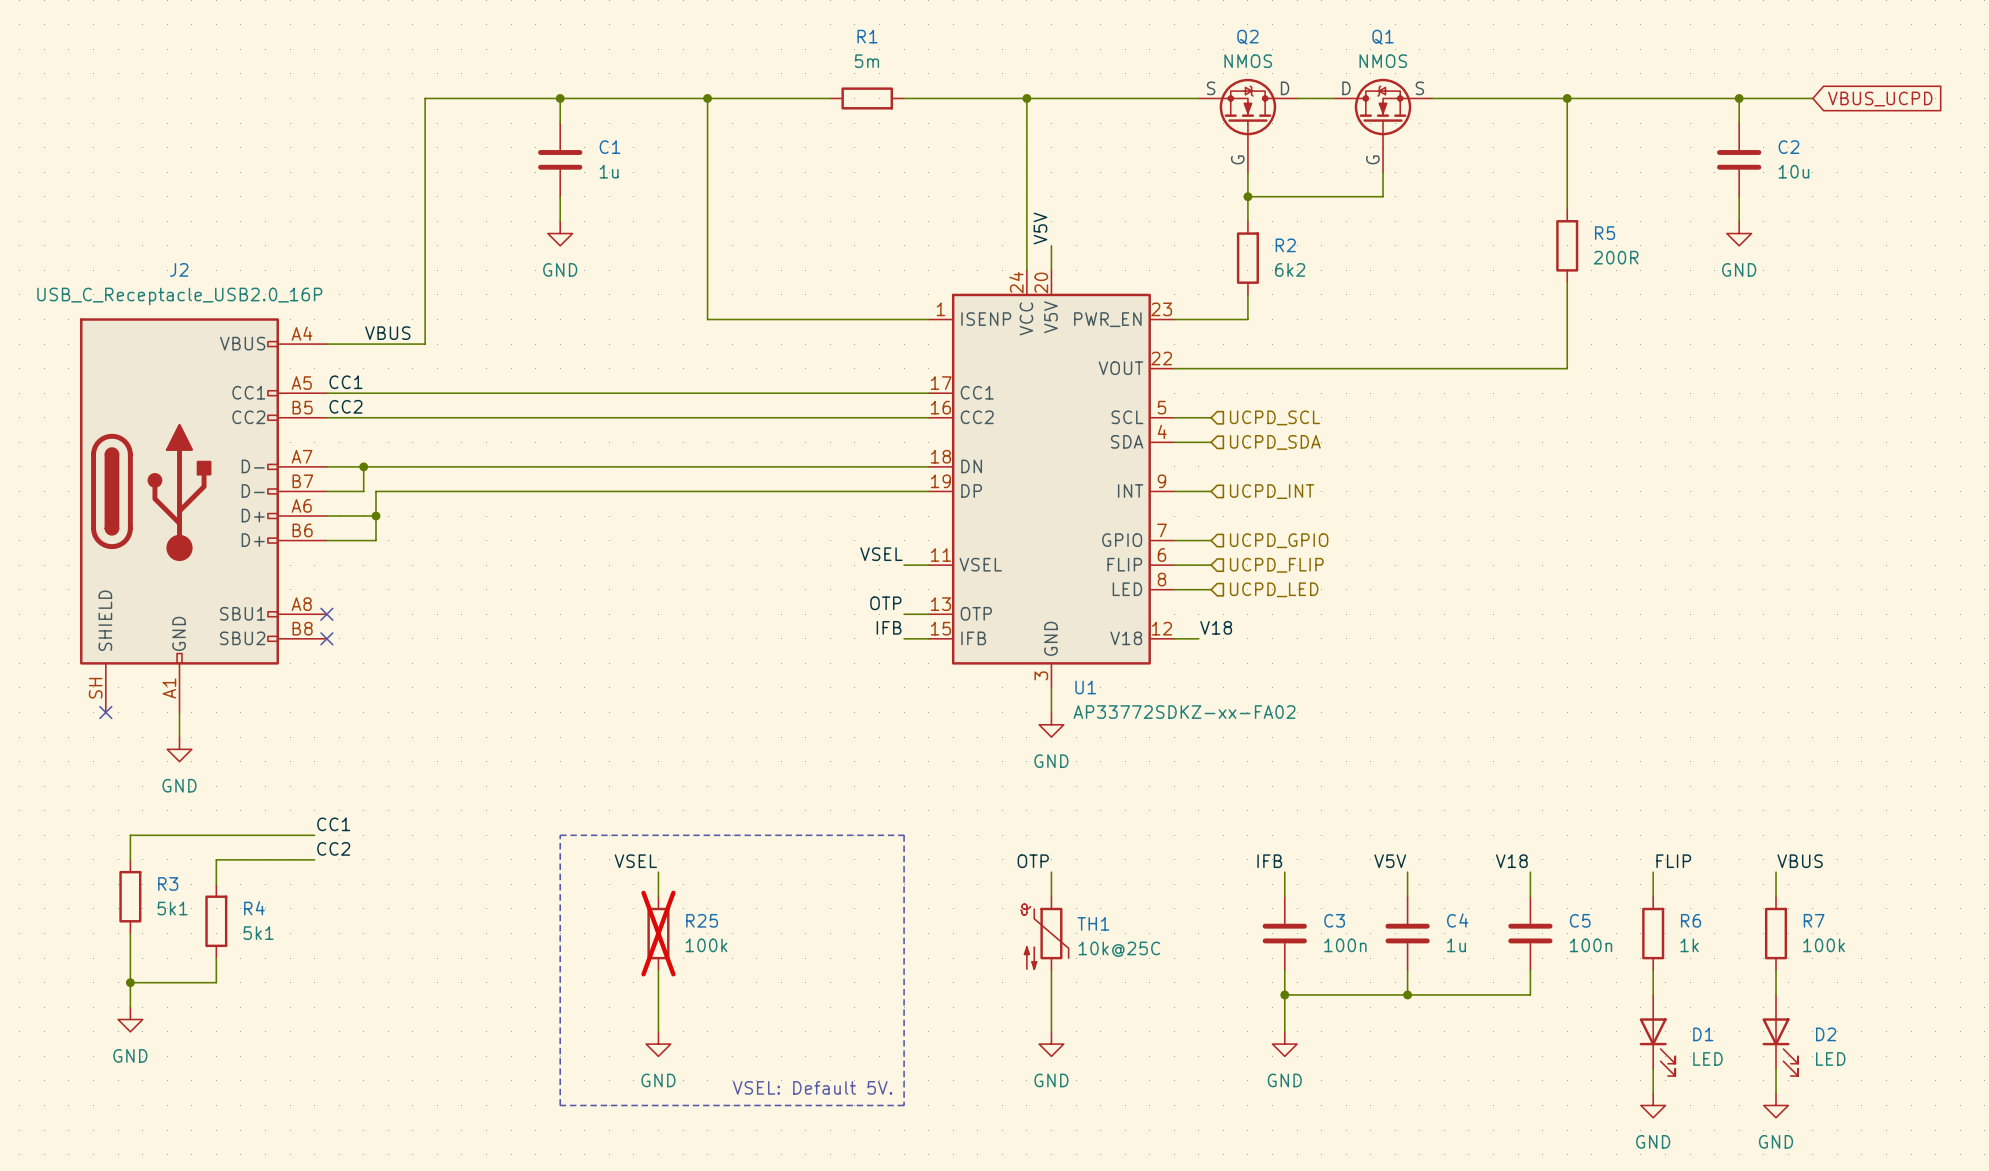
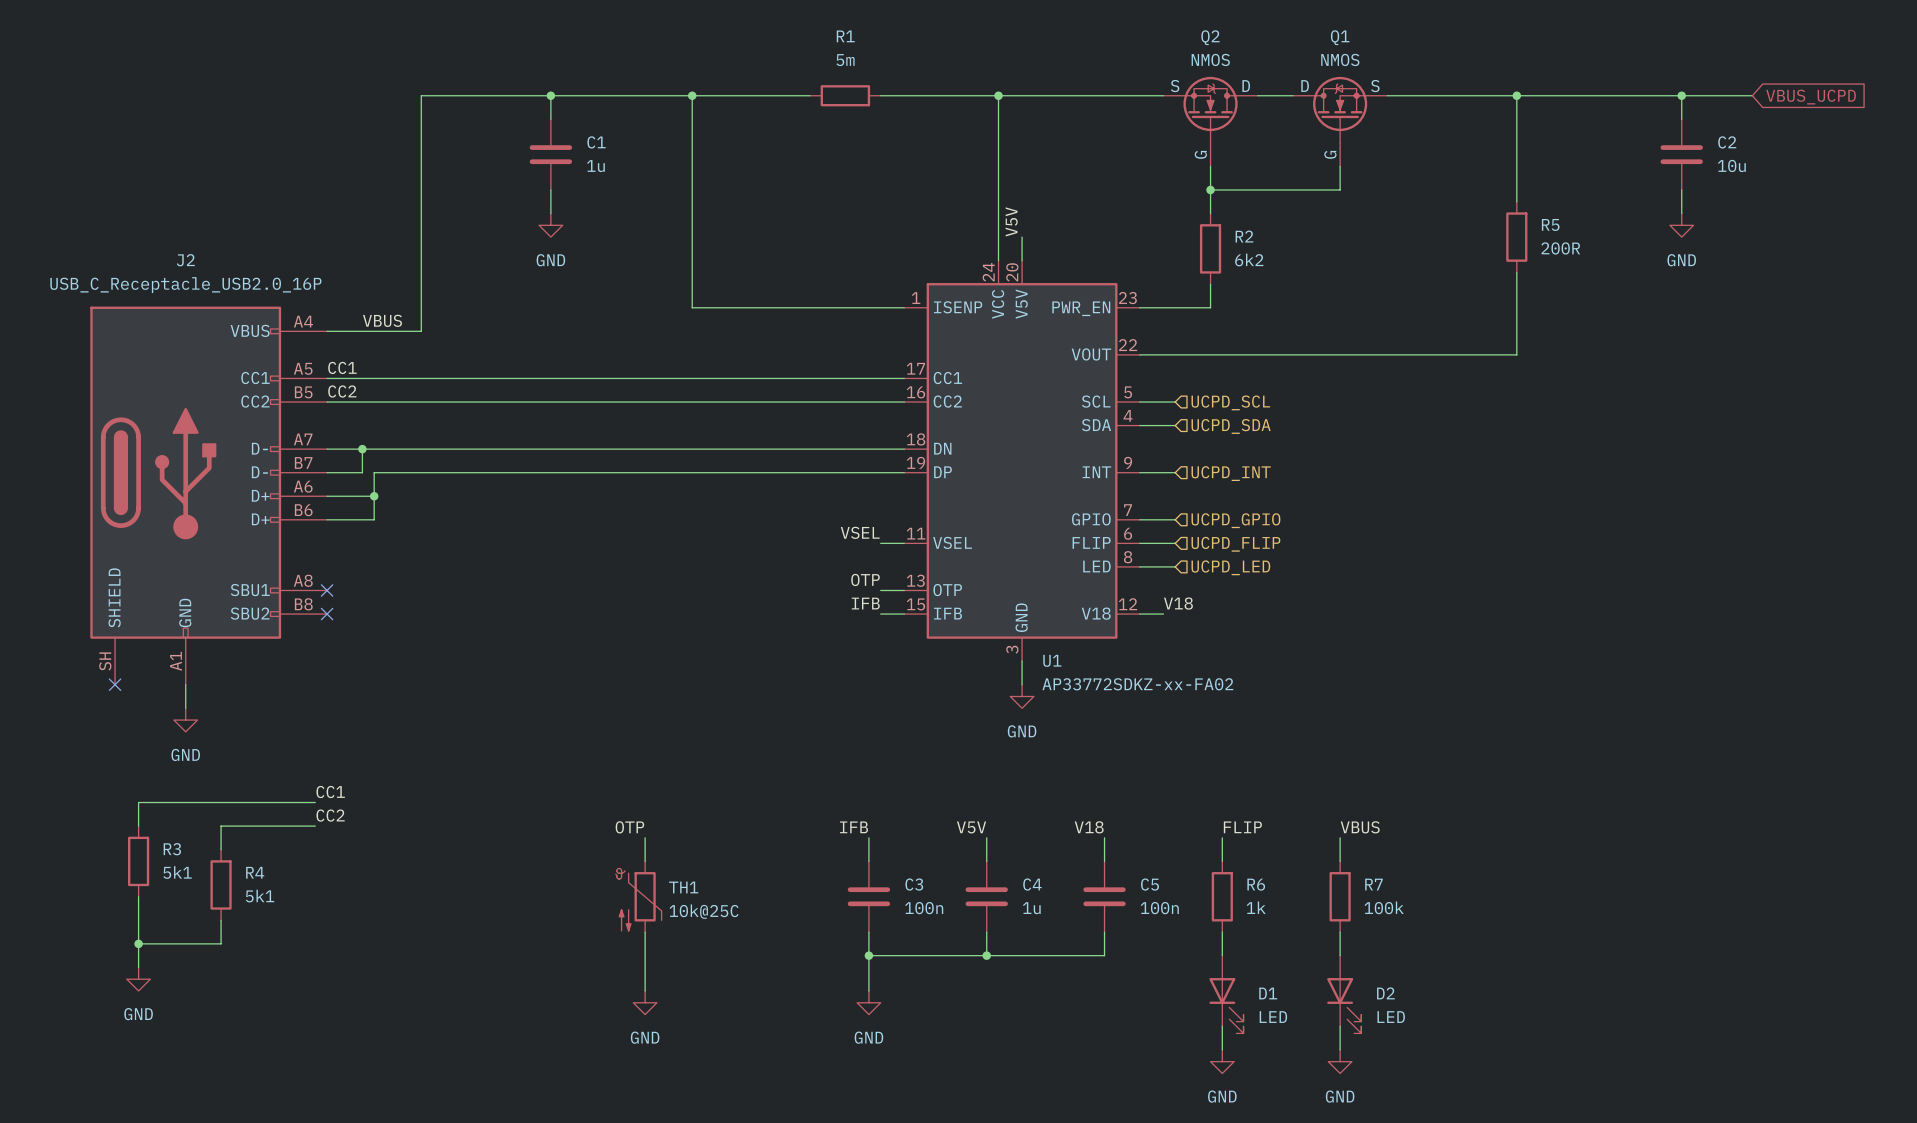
line: (560, 835) (904, 835) (904, 1105) (560, 1105) (560, 835) -> none
label: VSEL (635, 861) -> OTP (629, 827)
label: none -> IFB (853, 827)
label: none -> V5V (971, 827)
label: OTP (1033, 861) -> none
label: none -> V18 (1089, 827)
label: IFB (1269, 861) -> none
label: none -> FLIP (1242, 827)
label: V5V (1390, 861) -> none
label: none -> VBUS (1360, 827)
label: V18 (1511, 861) -> none
label: FLIP (1673, 861) -> none
label: VBUS (1800, 861) -> none
wire: none -> (986, 837) (986, 861)
wire: (1051, 872) (1051, 896) -> (868, 837) (868, 861)
wire: (1284, 872) (1284, 896) -> (1104, 837) (1104, 861)
wire: (1407, 872) (1407, 896) -> (1222, 837) (1222, 861)
wire: (1530, 872) (1530, 896) -> (1340, 837) (1340, 861)
wire: (1653, 872) (1653, 896) -> none
wire: (1776, 872) (1776, 896) -> none
R25: 100k (658, 933) -> none
TH1 position: (1044, 933) -> (638, 896)
C3 position: (1284, 933) -> (868, 896)
C4 position: (1407, 933) -> (986, 896)
C5 position: (1530, 933) -> (1104, 896)
R6 position: (1653, 933) -> (1222, 896)
R7 position: (1776, 933) -> (1340, 896)
wire: none -> (986, 932) (986, 955)
wire: (1051, 970) (1051, 1031) -> (868, 932) (868, 991)
wire: none -> (1104, 932) (1104, 955) (868, 955)
wire: (1284, 970) (1284, 1031) -> none
wire: none -> (1340, 932) (1340, 955)
wire: (1407, 970) (1407, 994) -> (1222, 932) (1222, 955)
wire: (1530, 970) (1530, 994) (1284, 994) -> none
wire: (1653, 970) (1653, 994) -> none
wire: (1776, 970) (1776, 994) -> none
junction: none -> (868, 955)
junction: none -> (986, 955)
junction: (1284, 994) -> none
junction: (1407, 994) -> none
D1 position: (1657, 1035) -> (1226, 994)
D2 position: (1780, 1035) -> (1344, 994)
power symbol: none -> GND (868, 1002)
power symbol: GND (1051, 1044) -> none
power symbol: GND (1284, 1044) -> none
wire: none -> (1222, 1026) (1222, 1049)
wire: none -> (1340, 1026) (1340, 1049)
wire: (1653, 1068) (1653, 1093) -> none
wire: (1776, 1068) (1776, 1093) -> none
text: VSEL: Default 5V. (812, 1087) -> none
power symbol: none -> GND (1222, 1061)
power symbol: none -> GND (1340, 1061)
power symbol: GND (1653, 1105) -> none
power symbol: GND (1776, 1105) -> none

